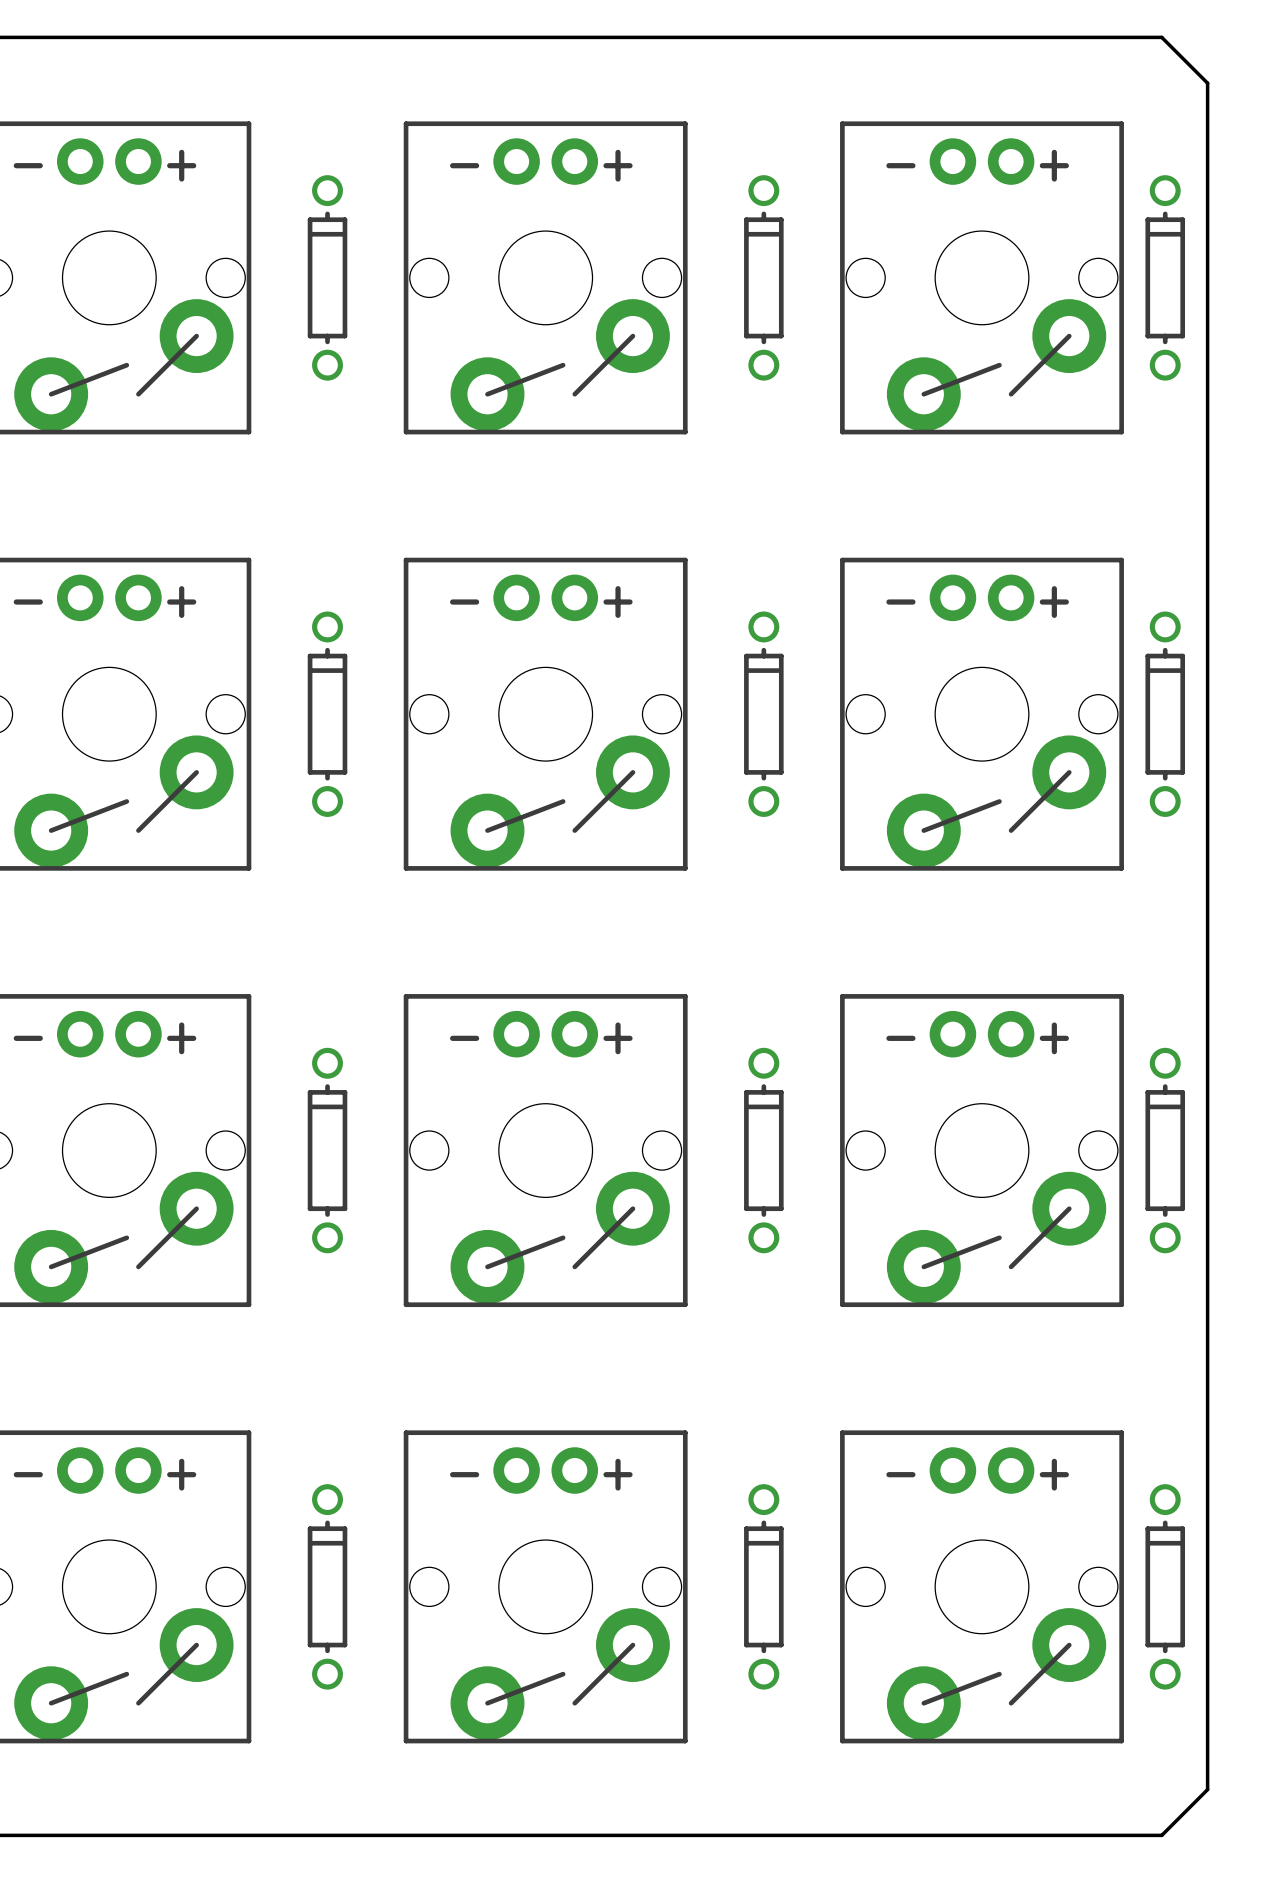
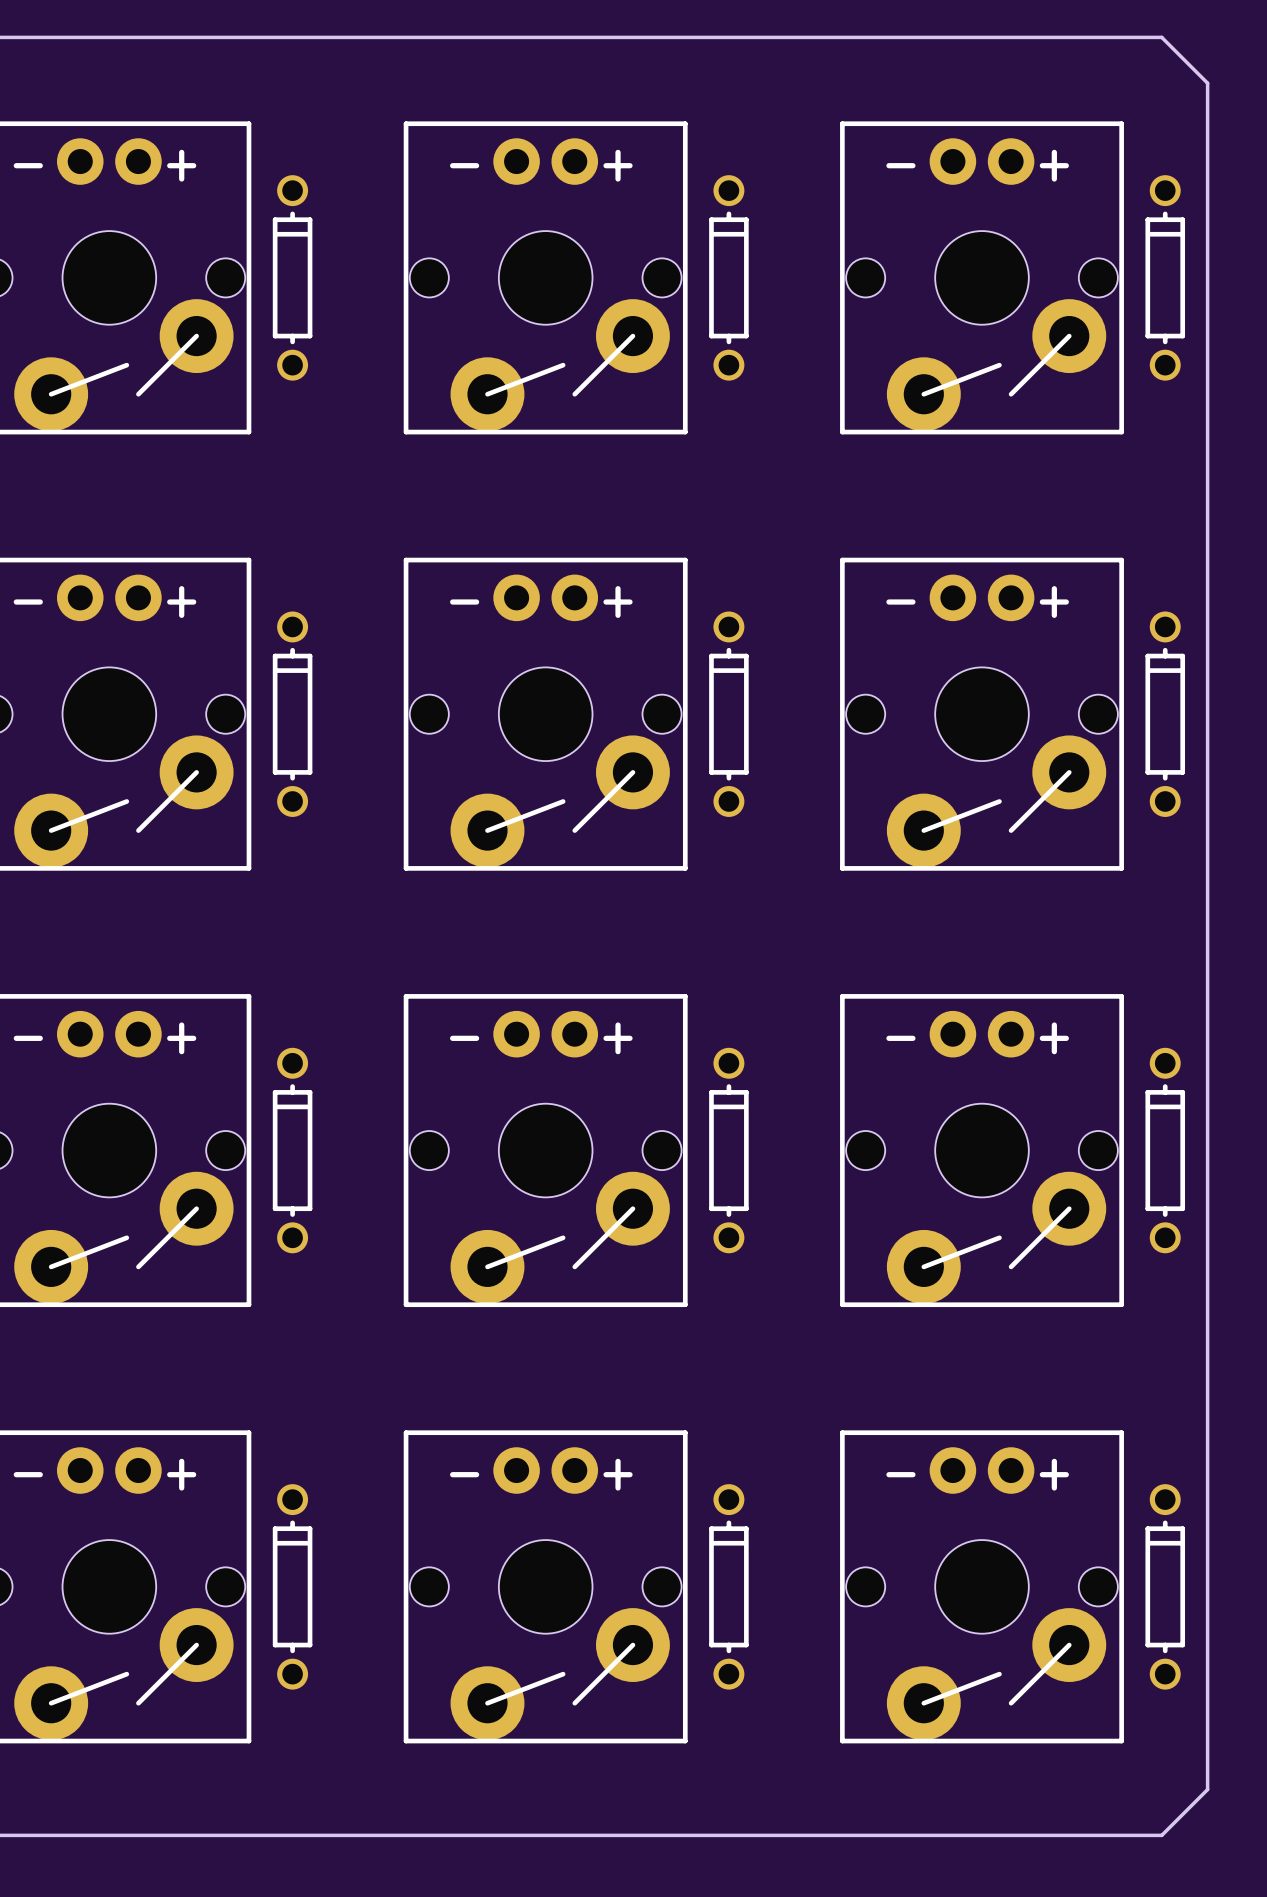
part position: (327, 277) -> (292, 277)
part position: (763, 277) -> (728, 277)
part position: (327, 714) -> (292, 714)
part position: (763, 714) -> (728, 714)
part position: (327, 1150) -> (292, 1150)
part position: (763, 1150) -> (728, 1150)
part position: (327, 1586) -> (292, 1586)
part position: (763, 1586) -> (728, 1586)

